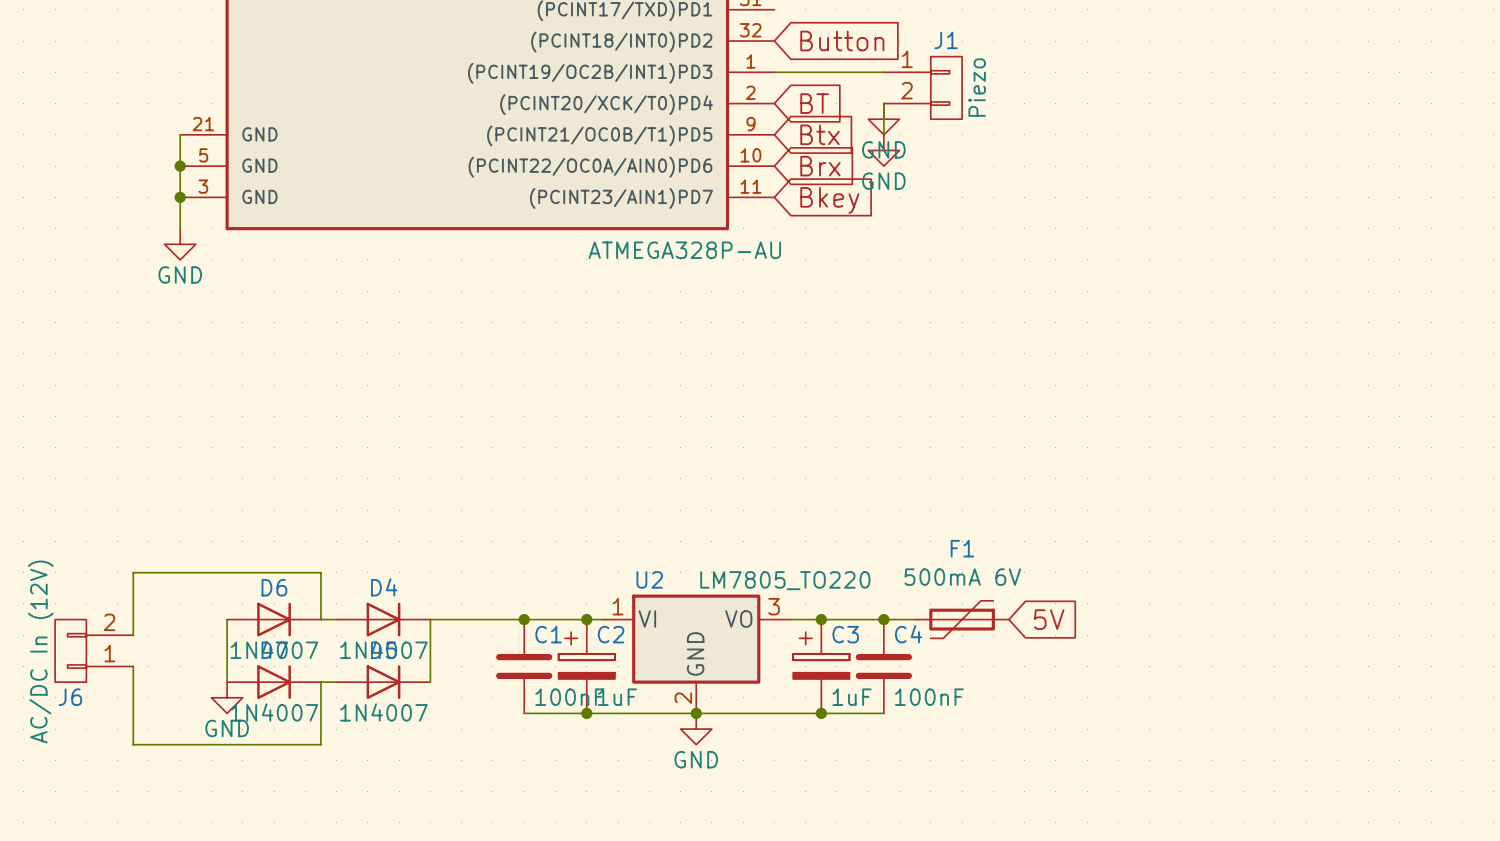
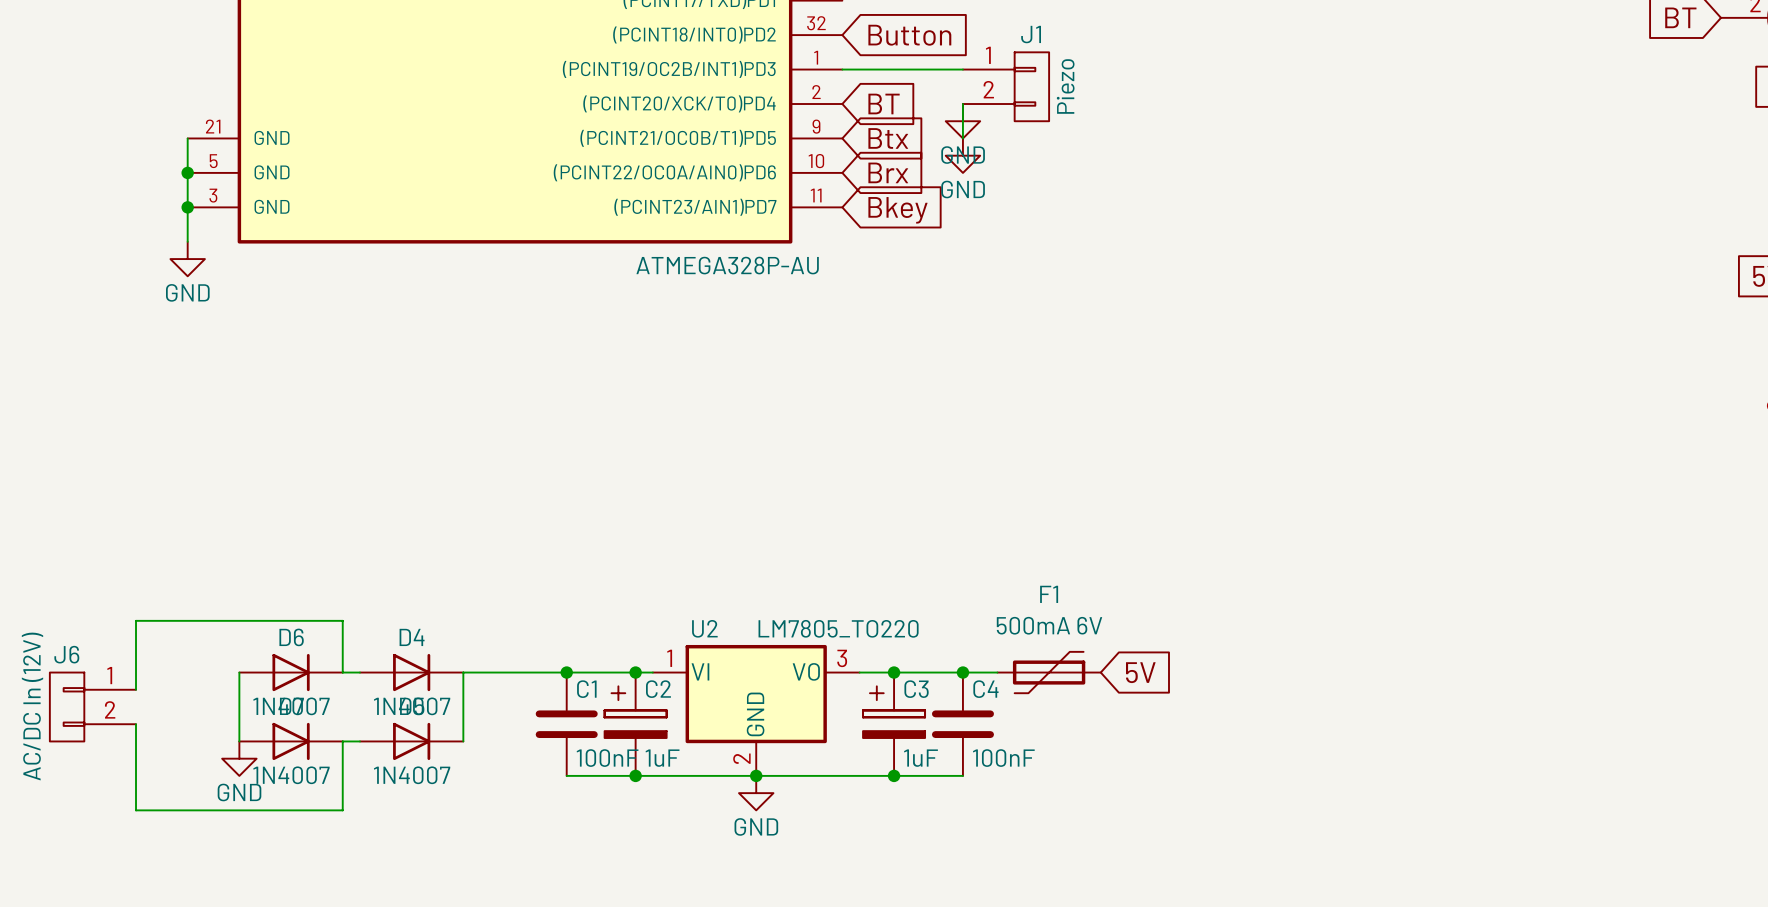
J6 flip: as is (70, 650) -> up-down (67, 706)

